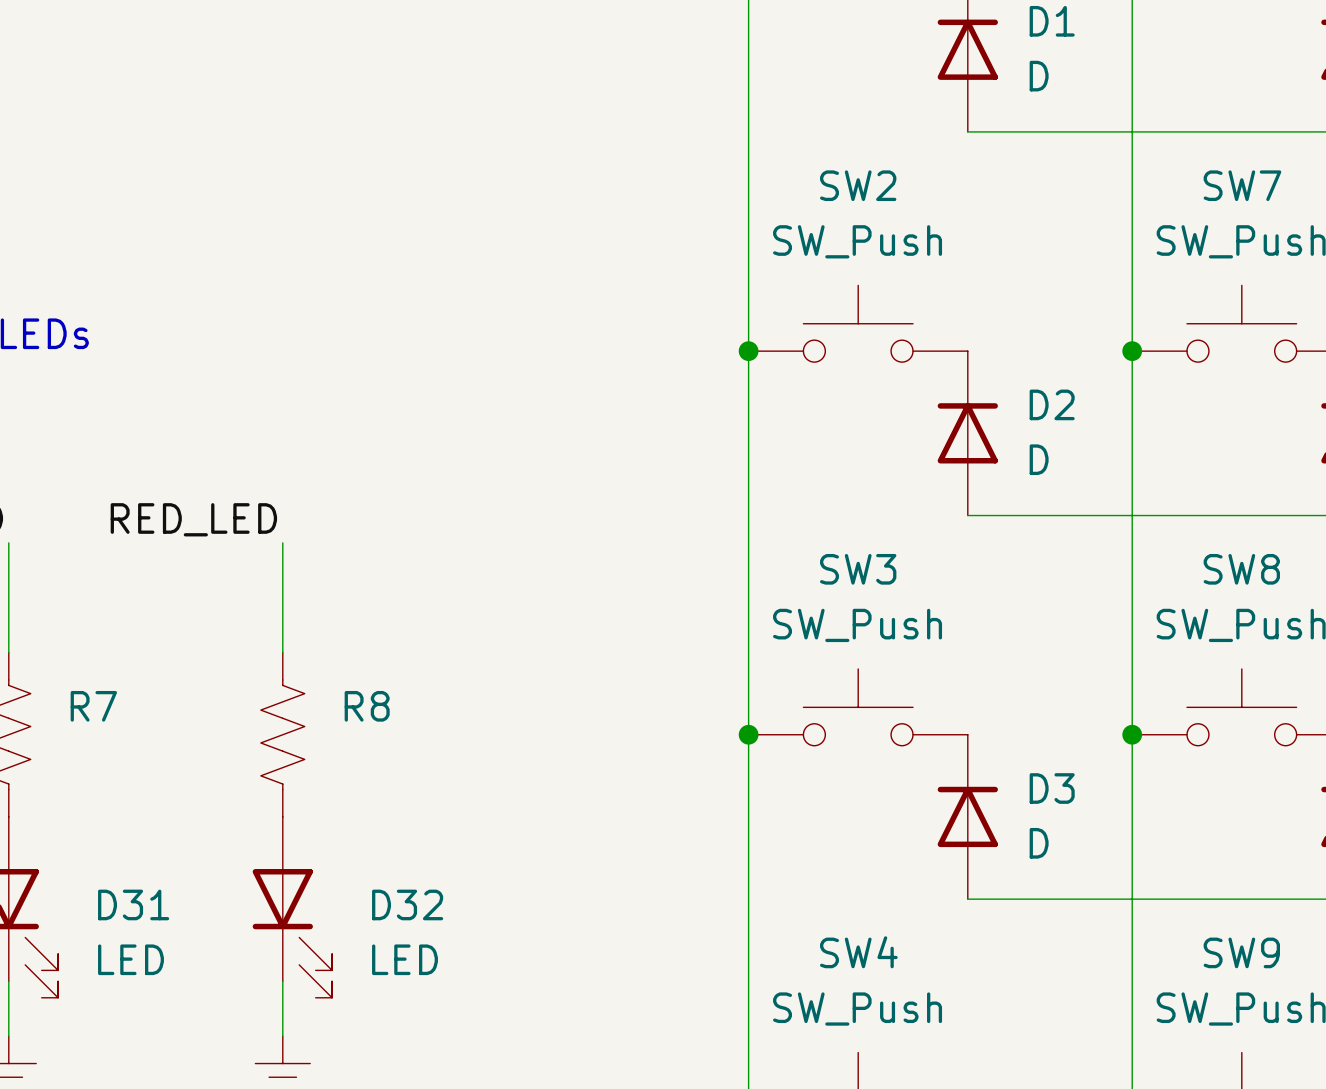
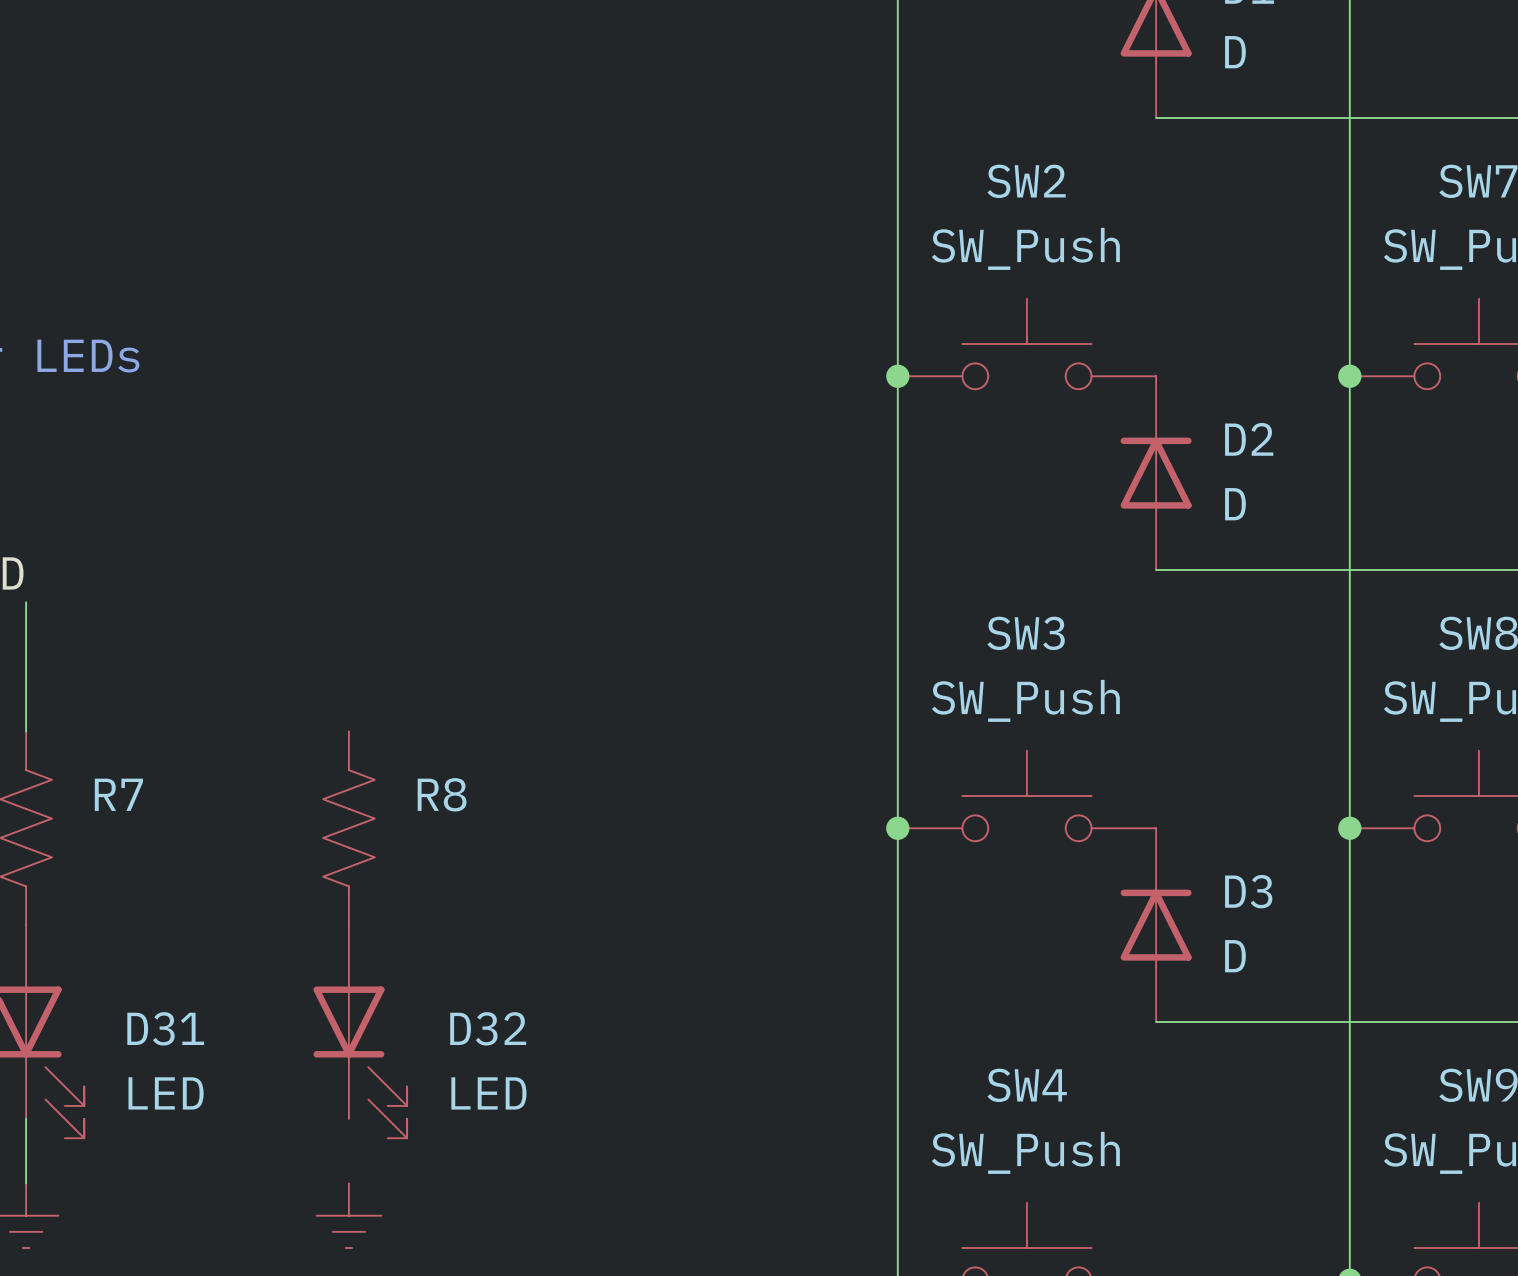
label: RED_LED (193, 519) -> none
wire: (282, 542) (282, 652) -> none
wire: (282, 981) (282, 1036) -> none

